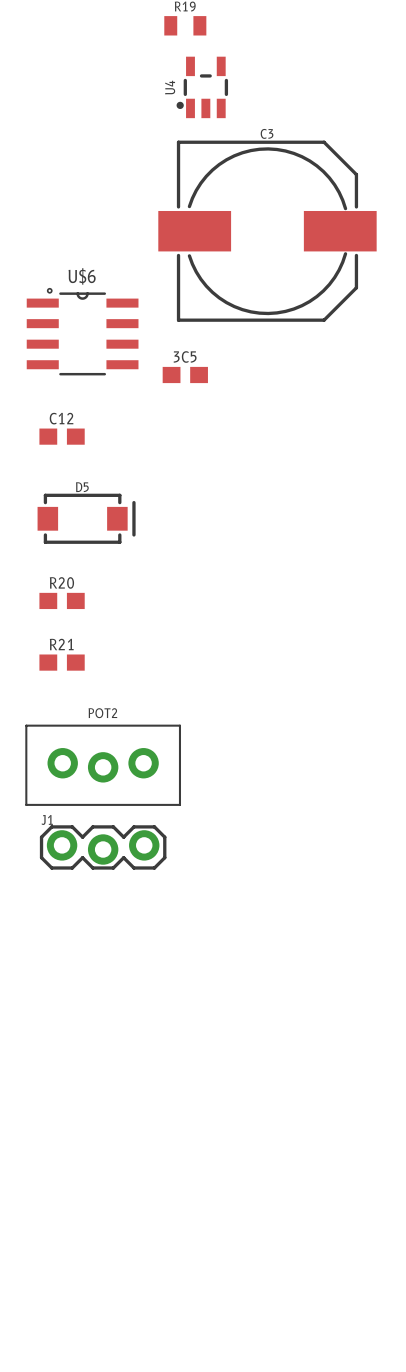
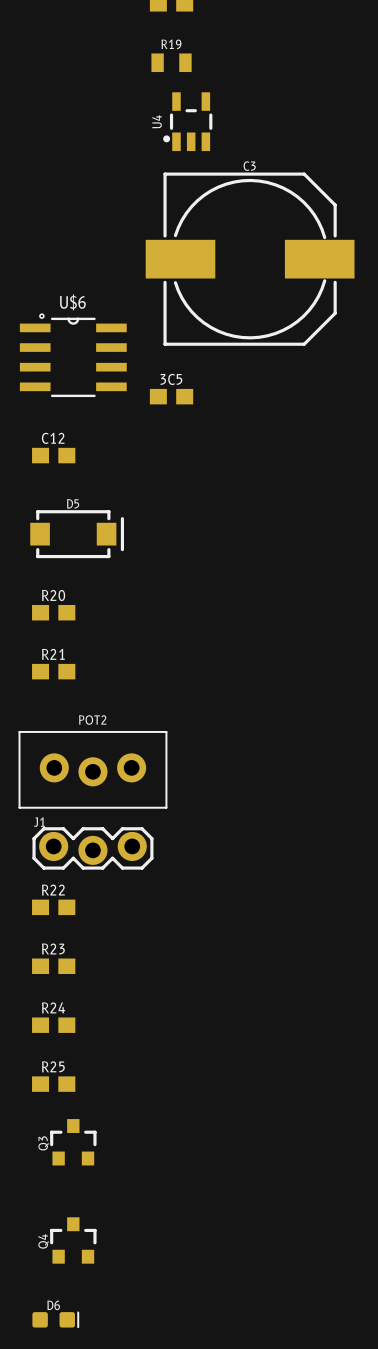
R22: none -> (53, 907)
R23: none -> (53, 966)
R24: none -> (53, 1025)
R25: none -> (53, 1084)
Q3: none -> (73, 1142)
Q4: none -> (73, 1240)
D6: none -> (55, 1319)

